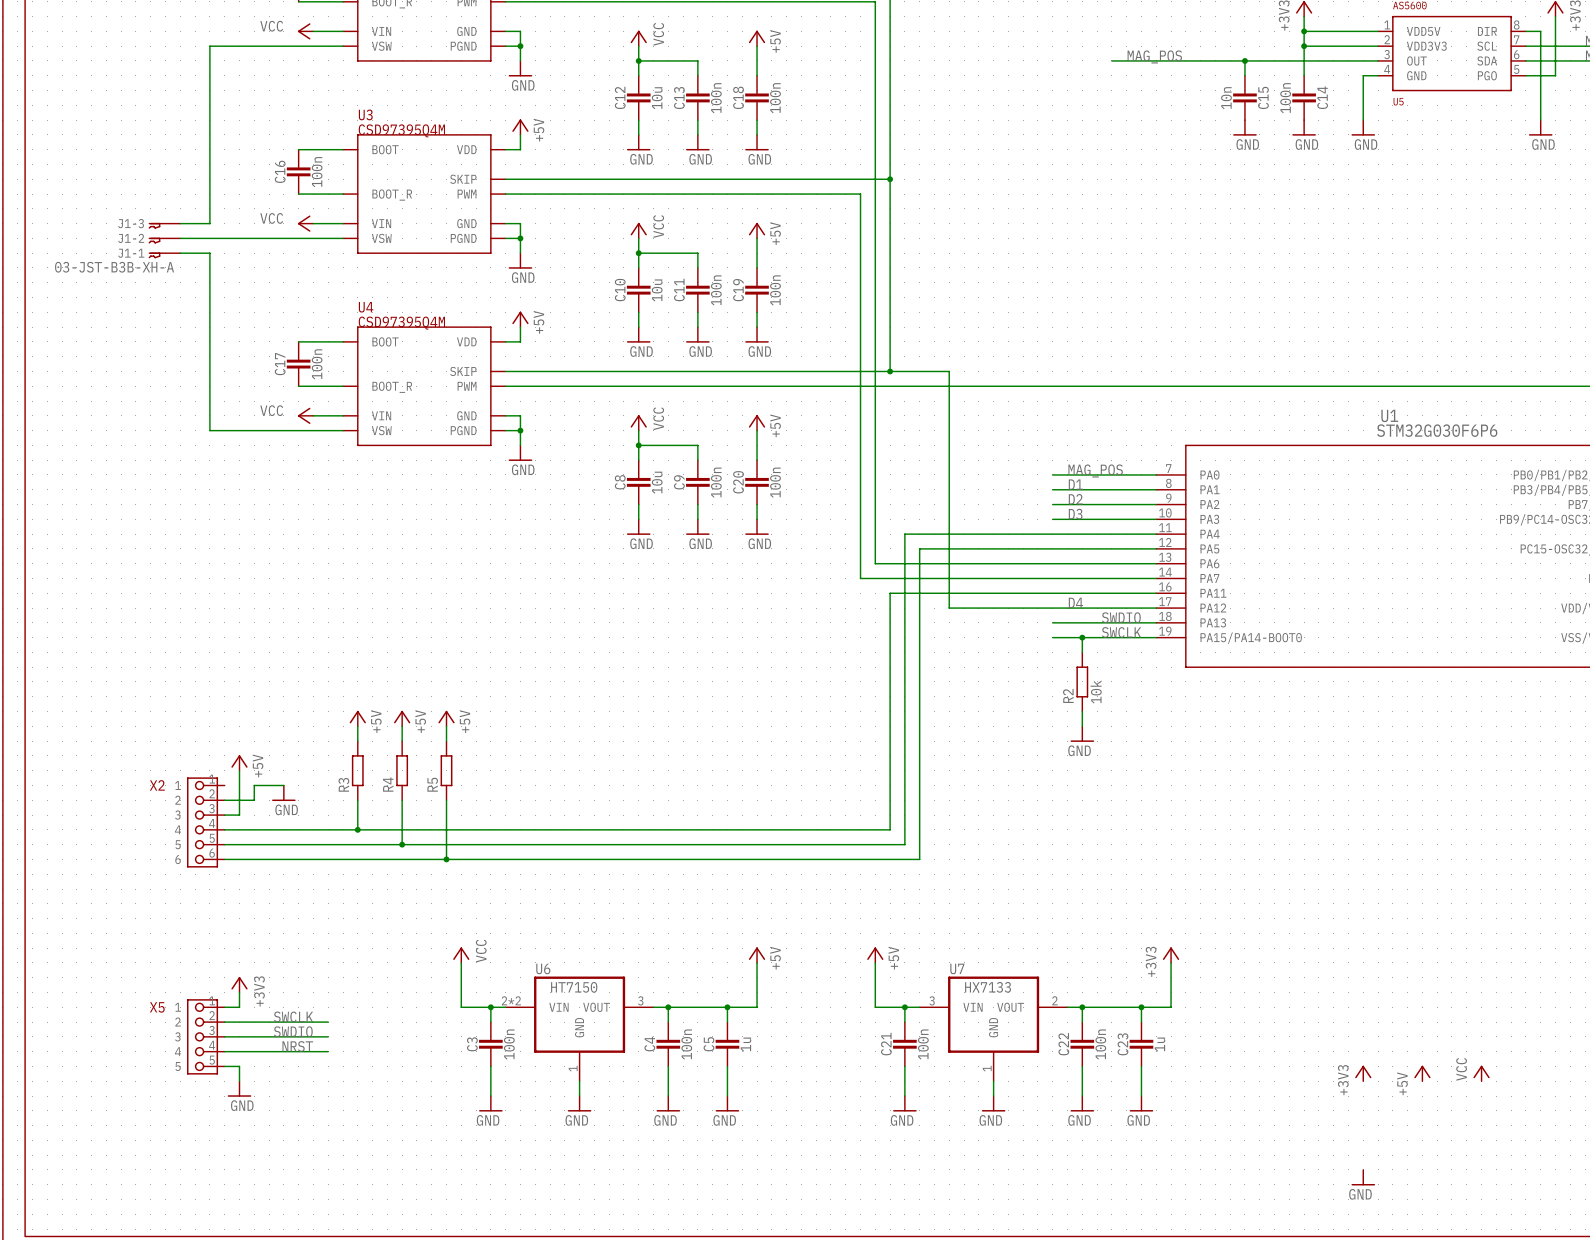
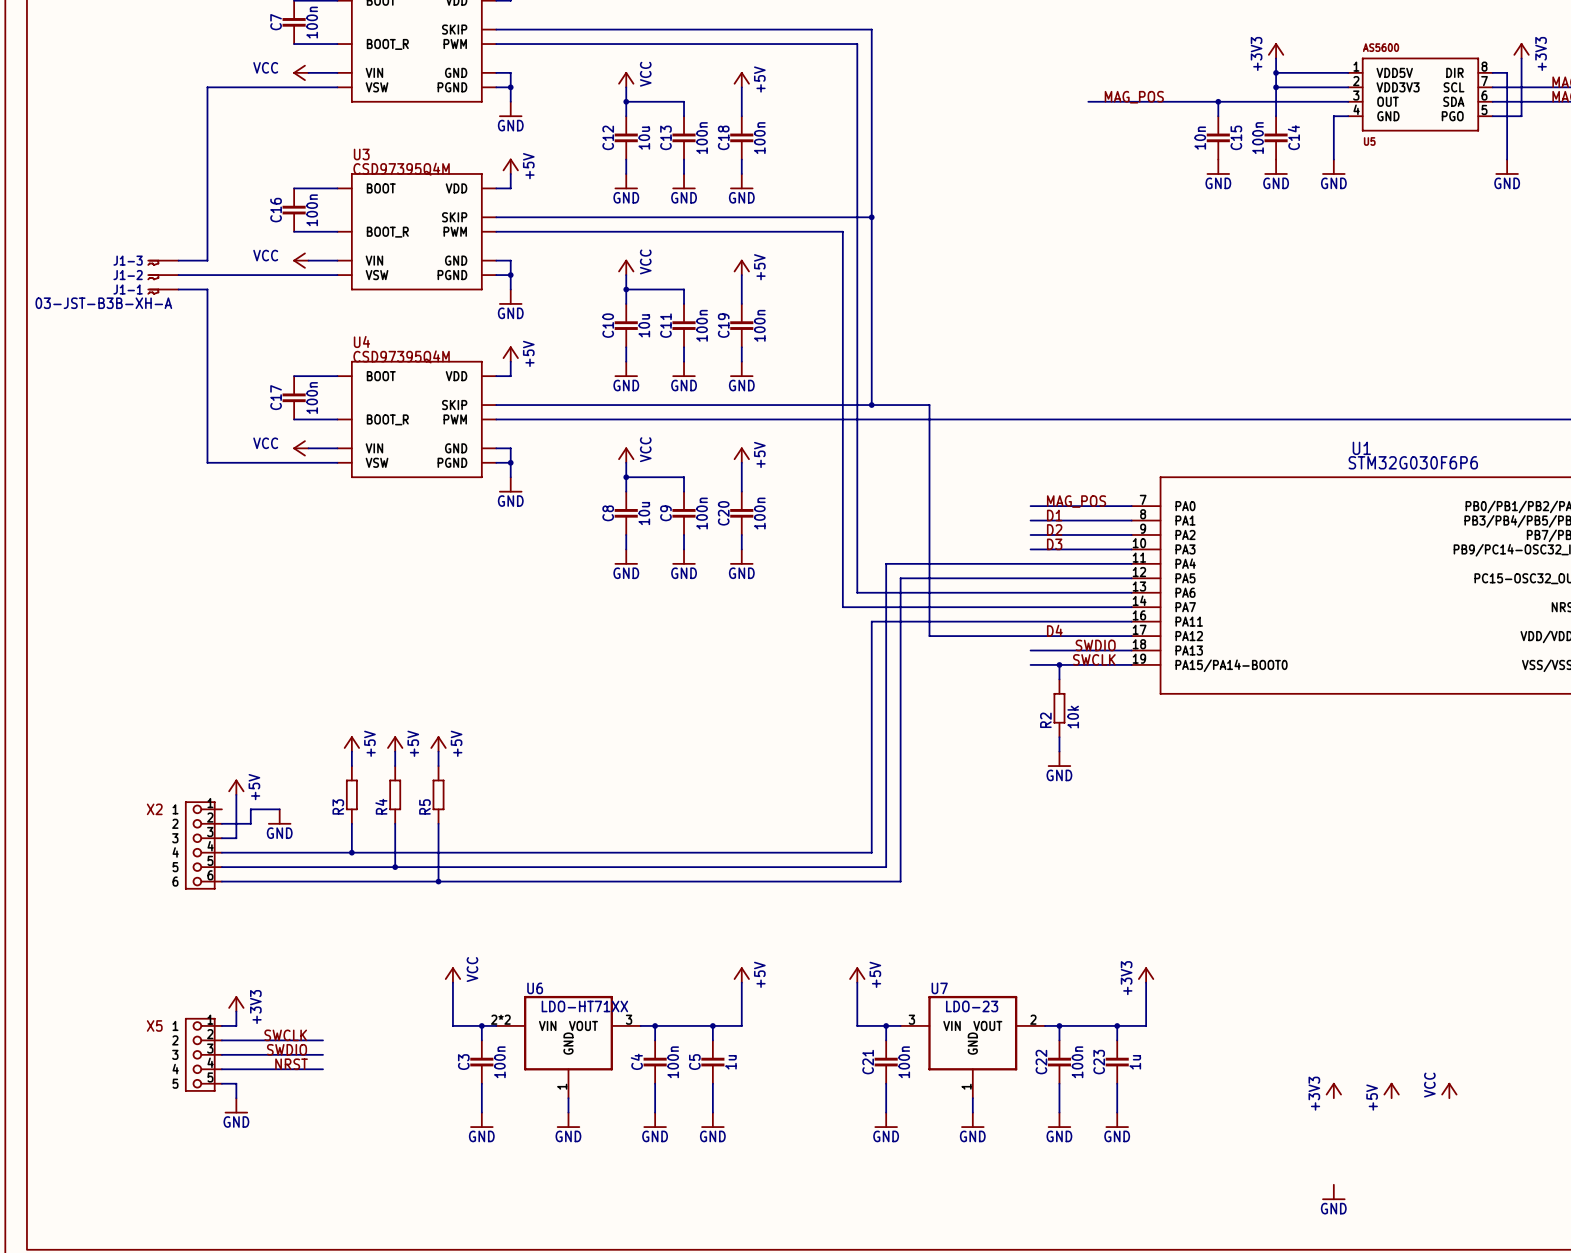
U6 value: HT7150 (574, 987) -> LDO-HT71XX (584, 1006)
U7 value: HX7133 (988, 987) -> LDO-23 (972, 1006)

